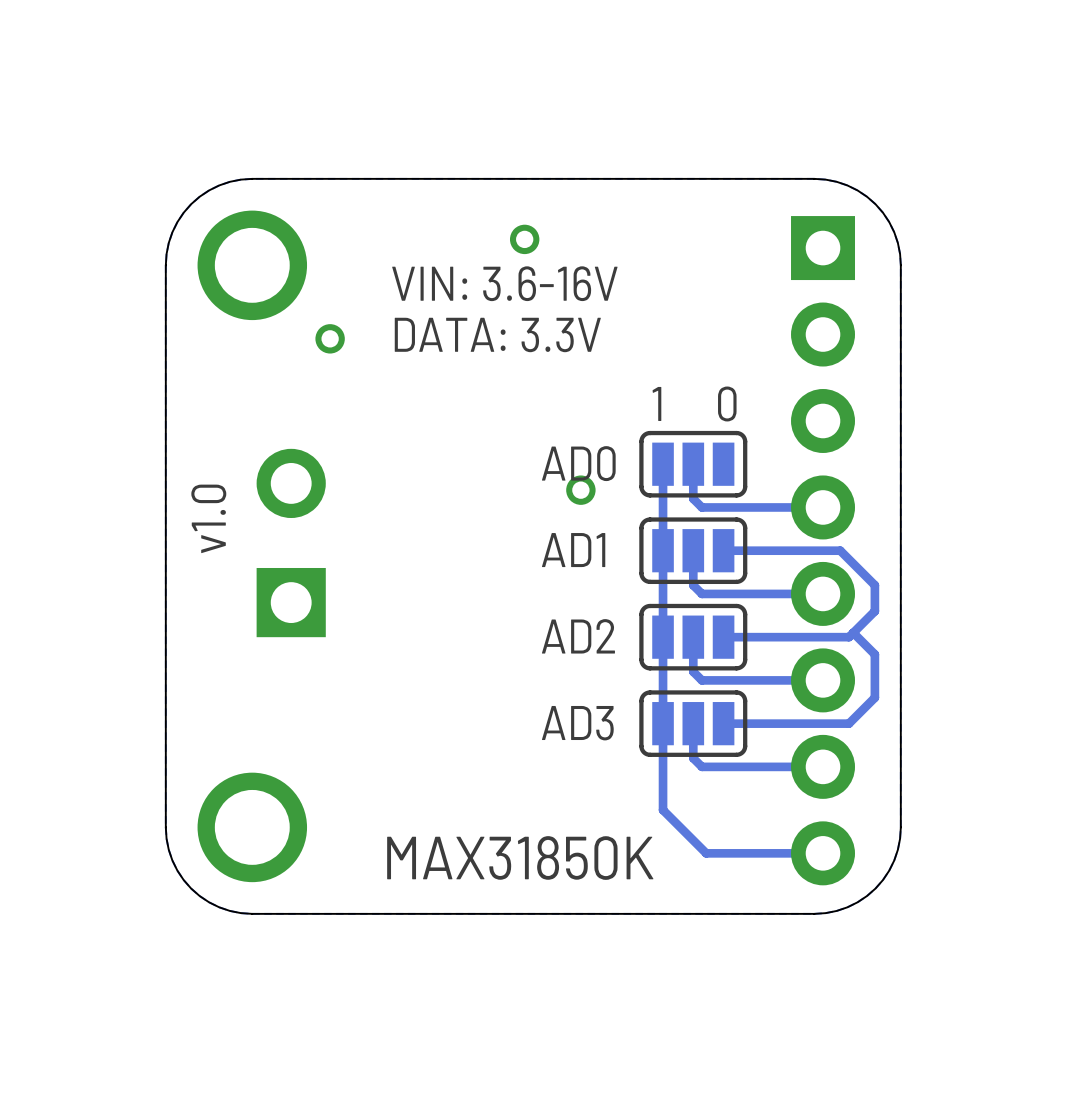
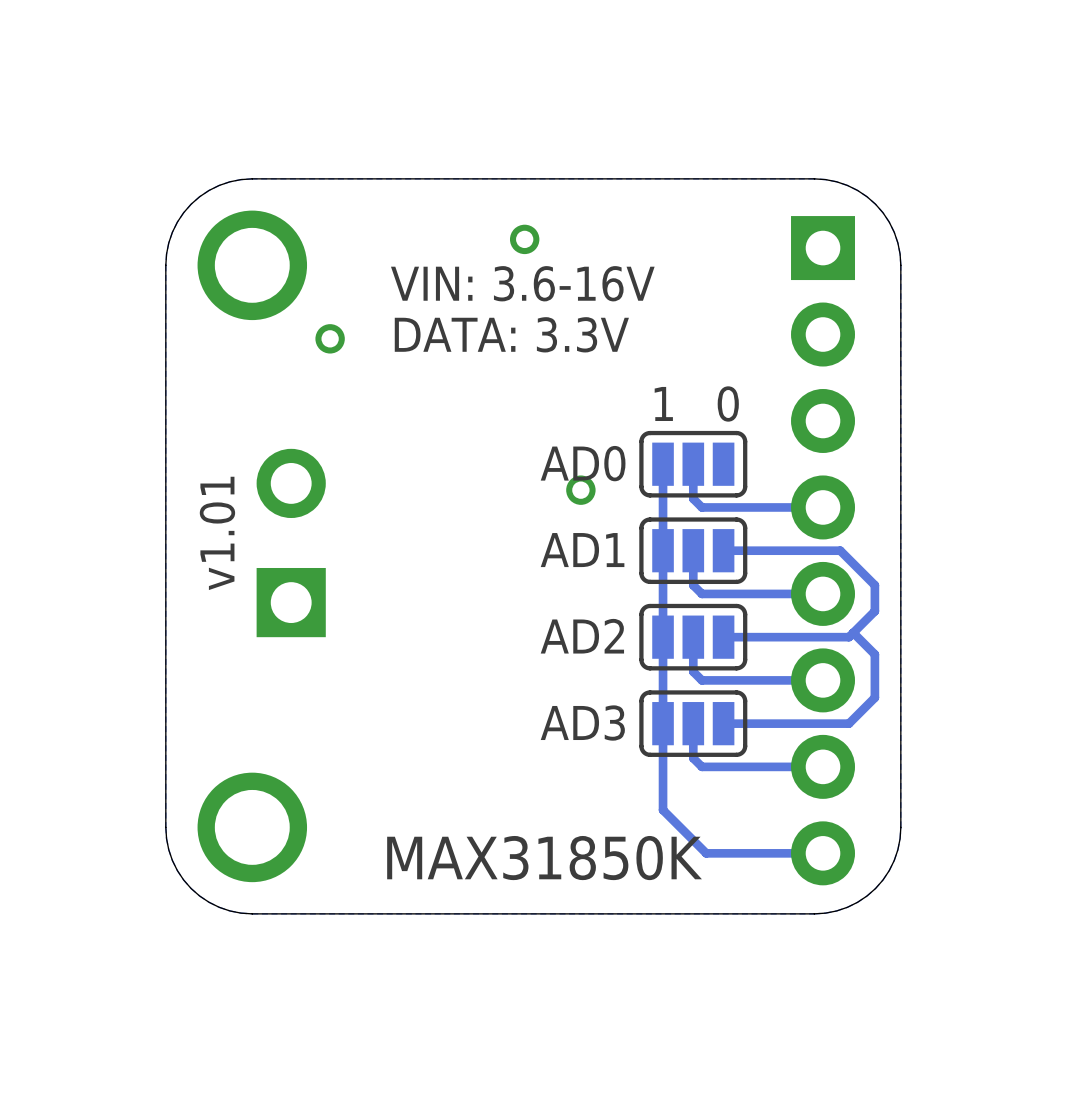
text: v1.0 (208, 518) -> v1.01 (217, 533)

